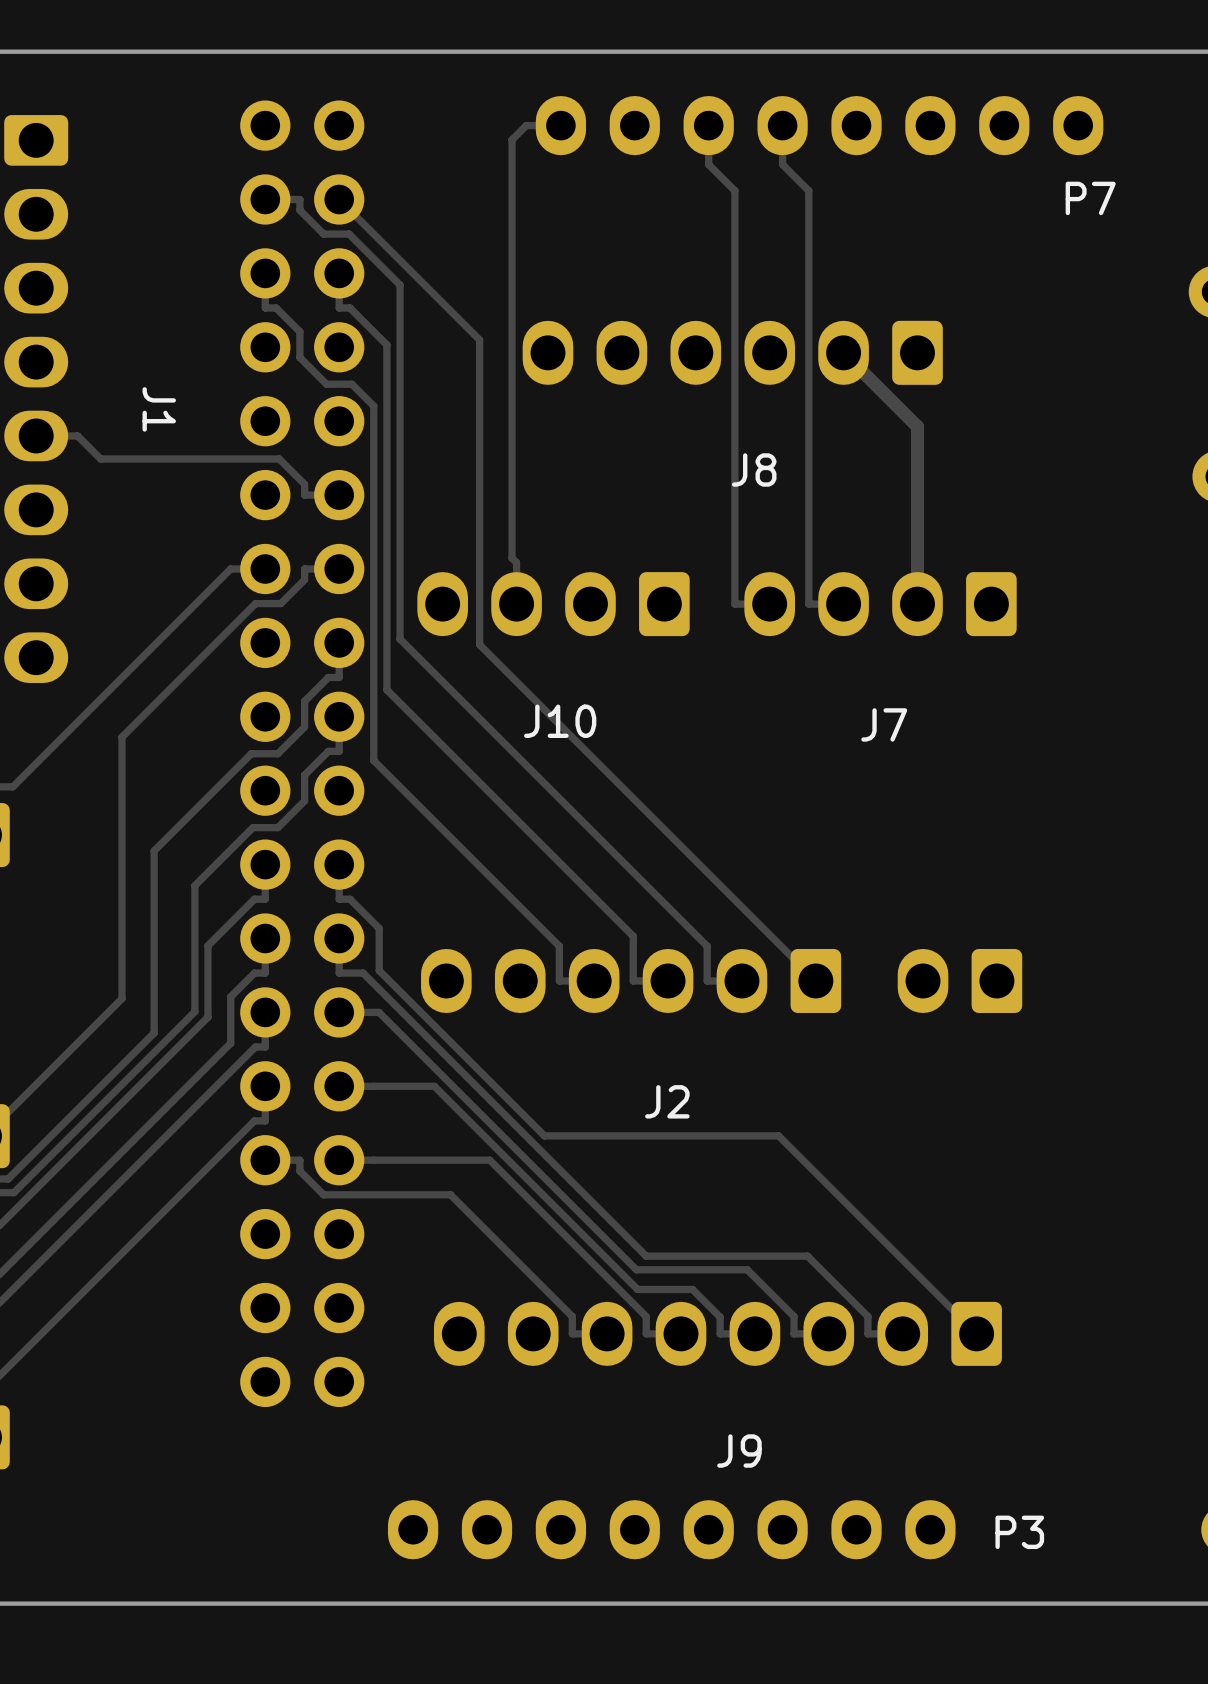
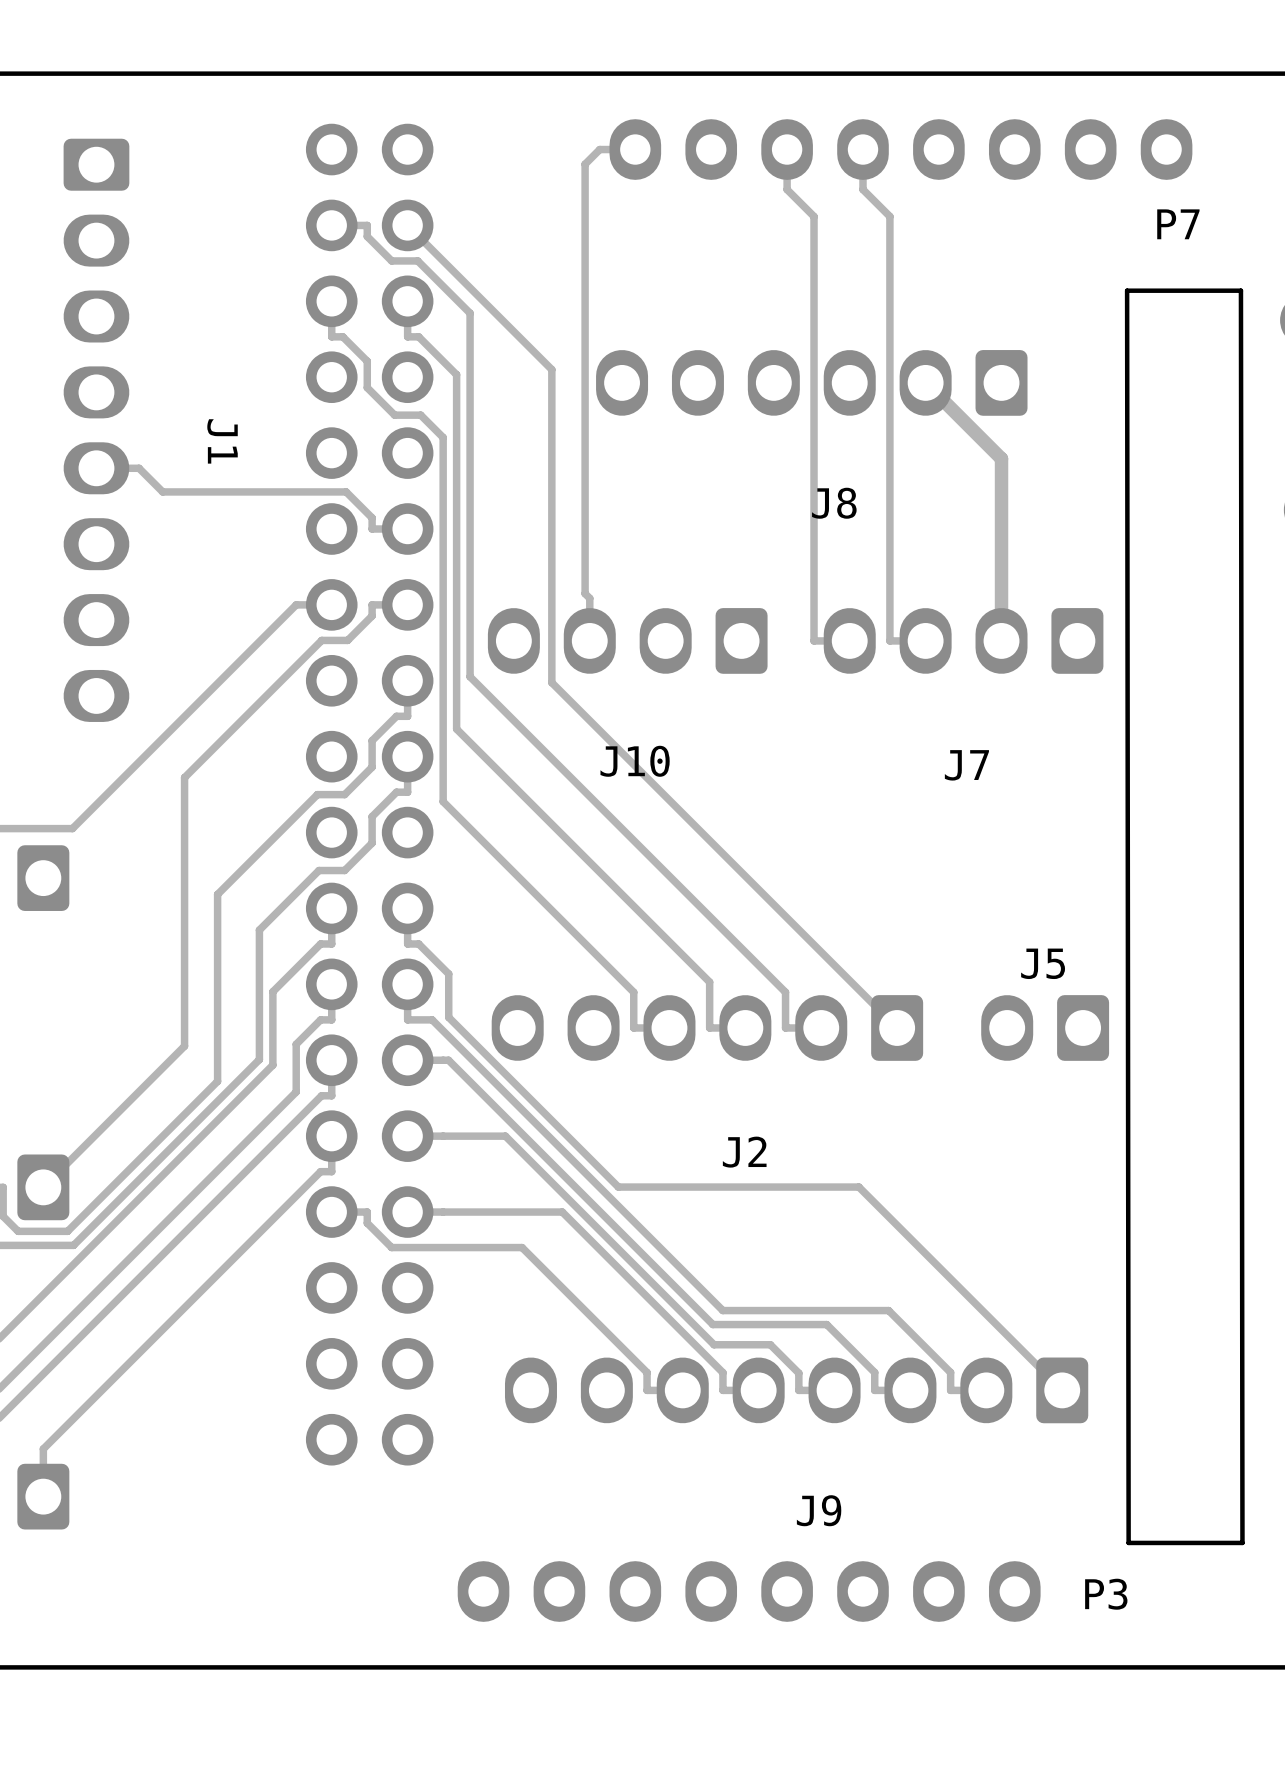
board edge: none -> (1240, 290) (1242, 1542) (1128, 1542) (1127, 290) (1240, 290)
J5 name: none -> J5 (1043, 963)

